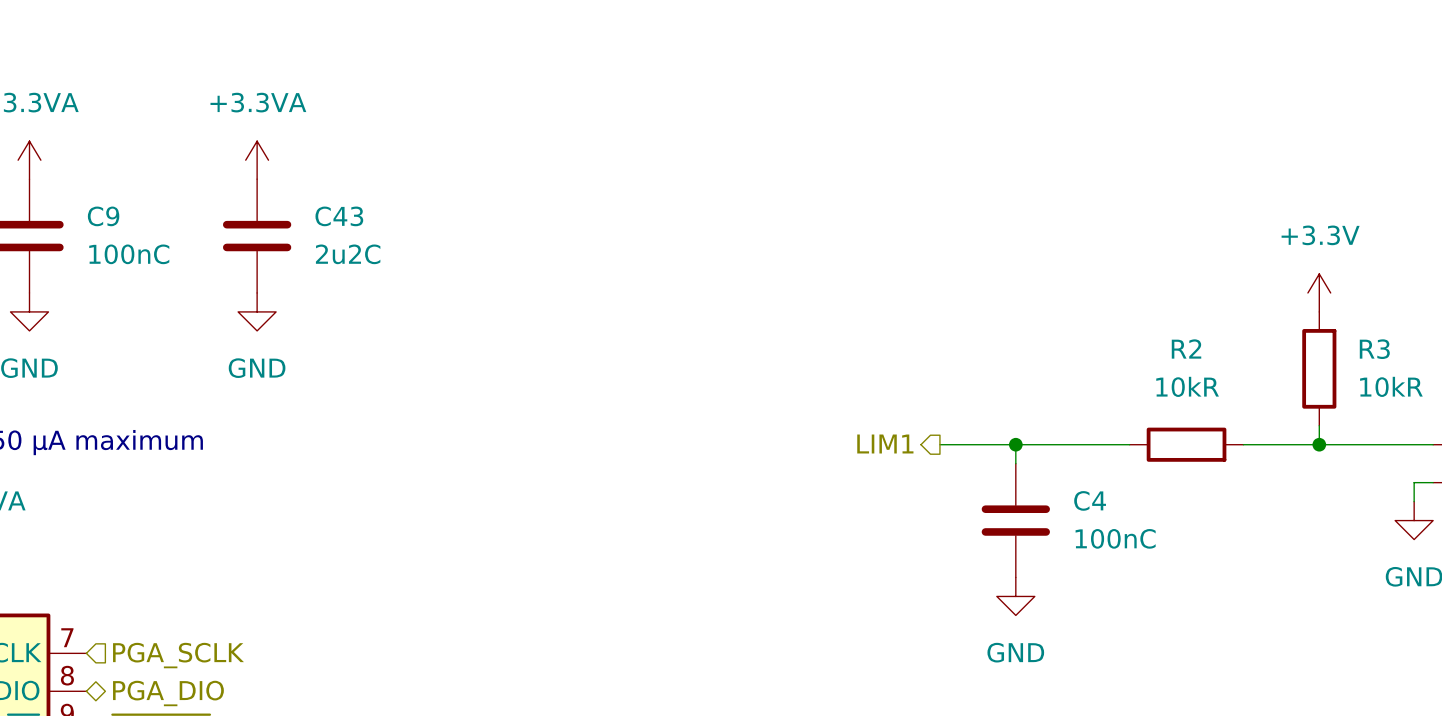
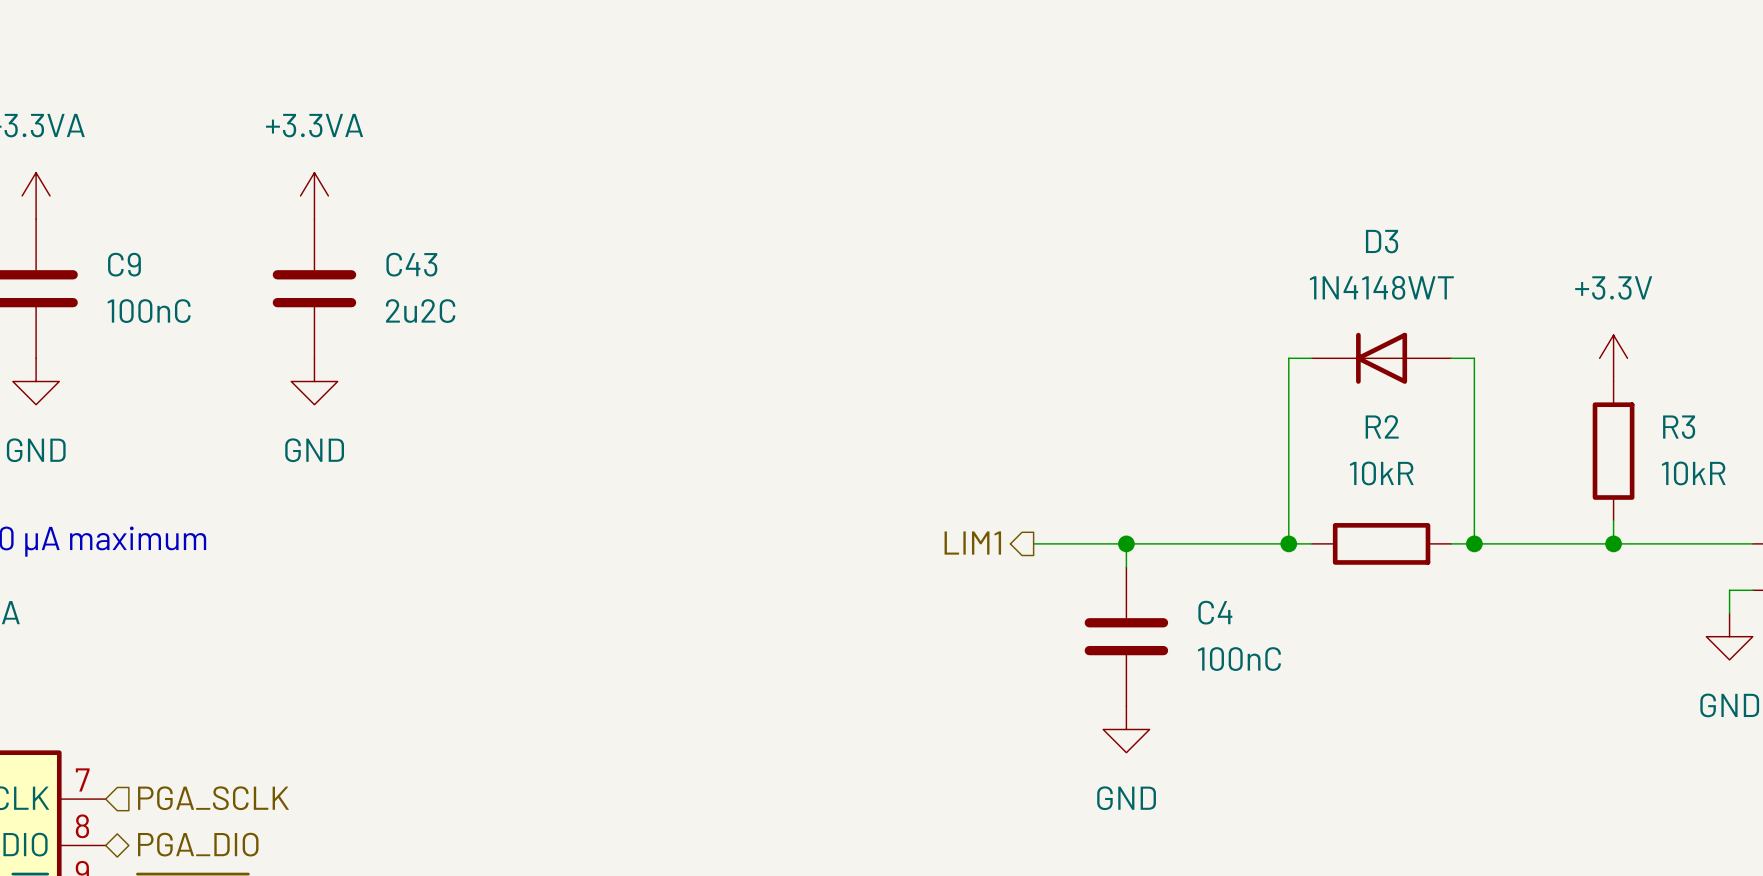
wire: none -> (1311, 358) (1288, 358) (1288, 543)
D3: none -> 1N4148WT (1381, 358)
wire: none -> (1451, 358) (1474, 358) (1474, 543)
wire: none -> (1033, 543) (1149, 543)
hierarchical label position: LIM1 (885, 444) -> LIM1 (972, 543)
junction: none -> (1126, 543)
wire: (1015, 444) (1015, 463) -> (1126, 543) (1126, 567)
junction position: (1015, 444) -> (1288, 543)
wire: (1072, 444) (1129, 444) -> (1451, 543) (1520, 543)
R2 position: (1186, 444) -> (1381, 543)
junction: none -> (1474, 543)
C4 position: (1015, 520) -> (1126, 636)
power symbol position: GND (1015, 596) -> GND (1126, 729)

